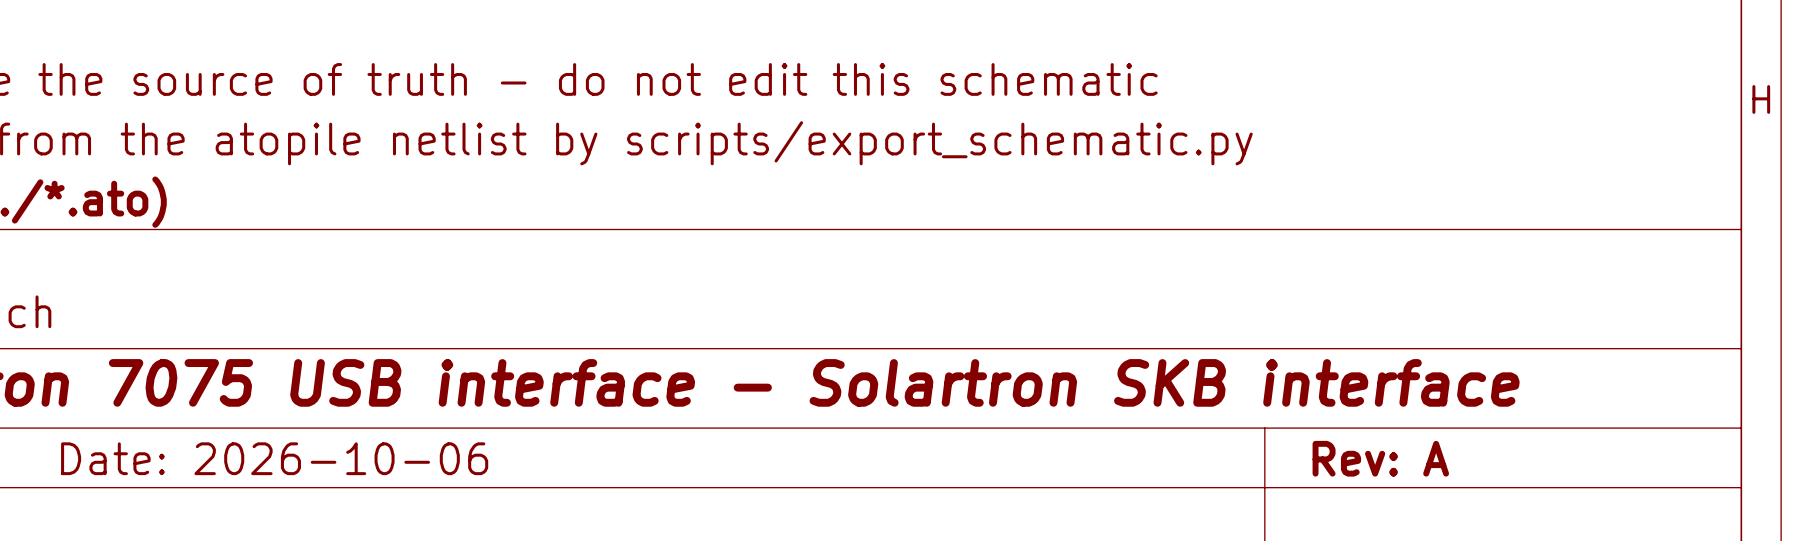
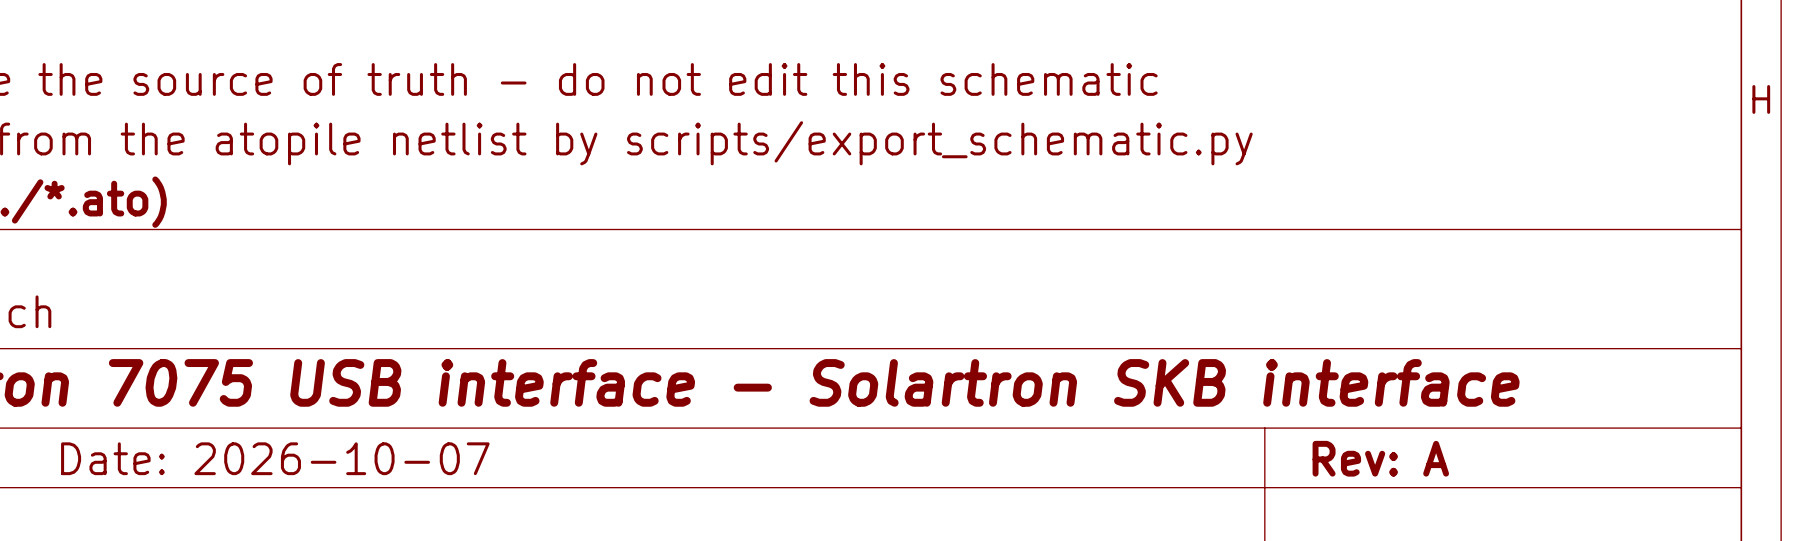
title block: Date: 2026-10-06 (274, 458) -> Date: 2026-10-07 (275, 458)

